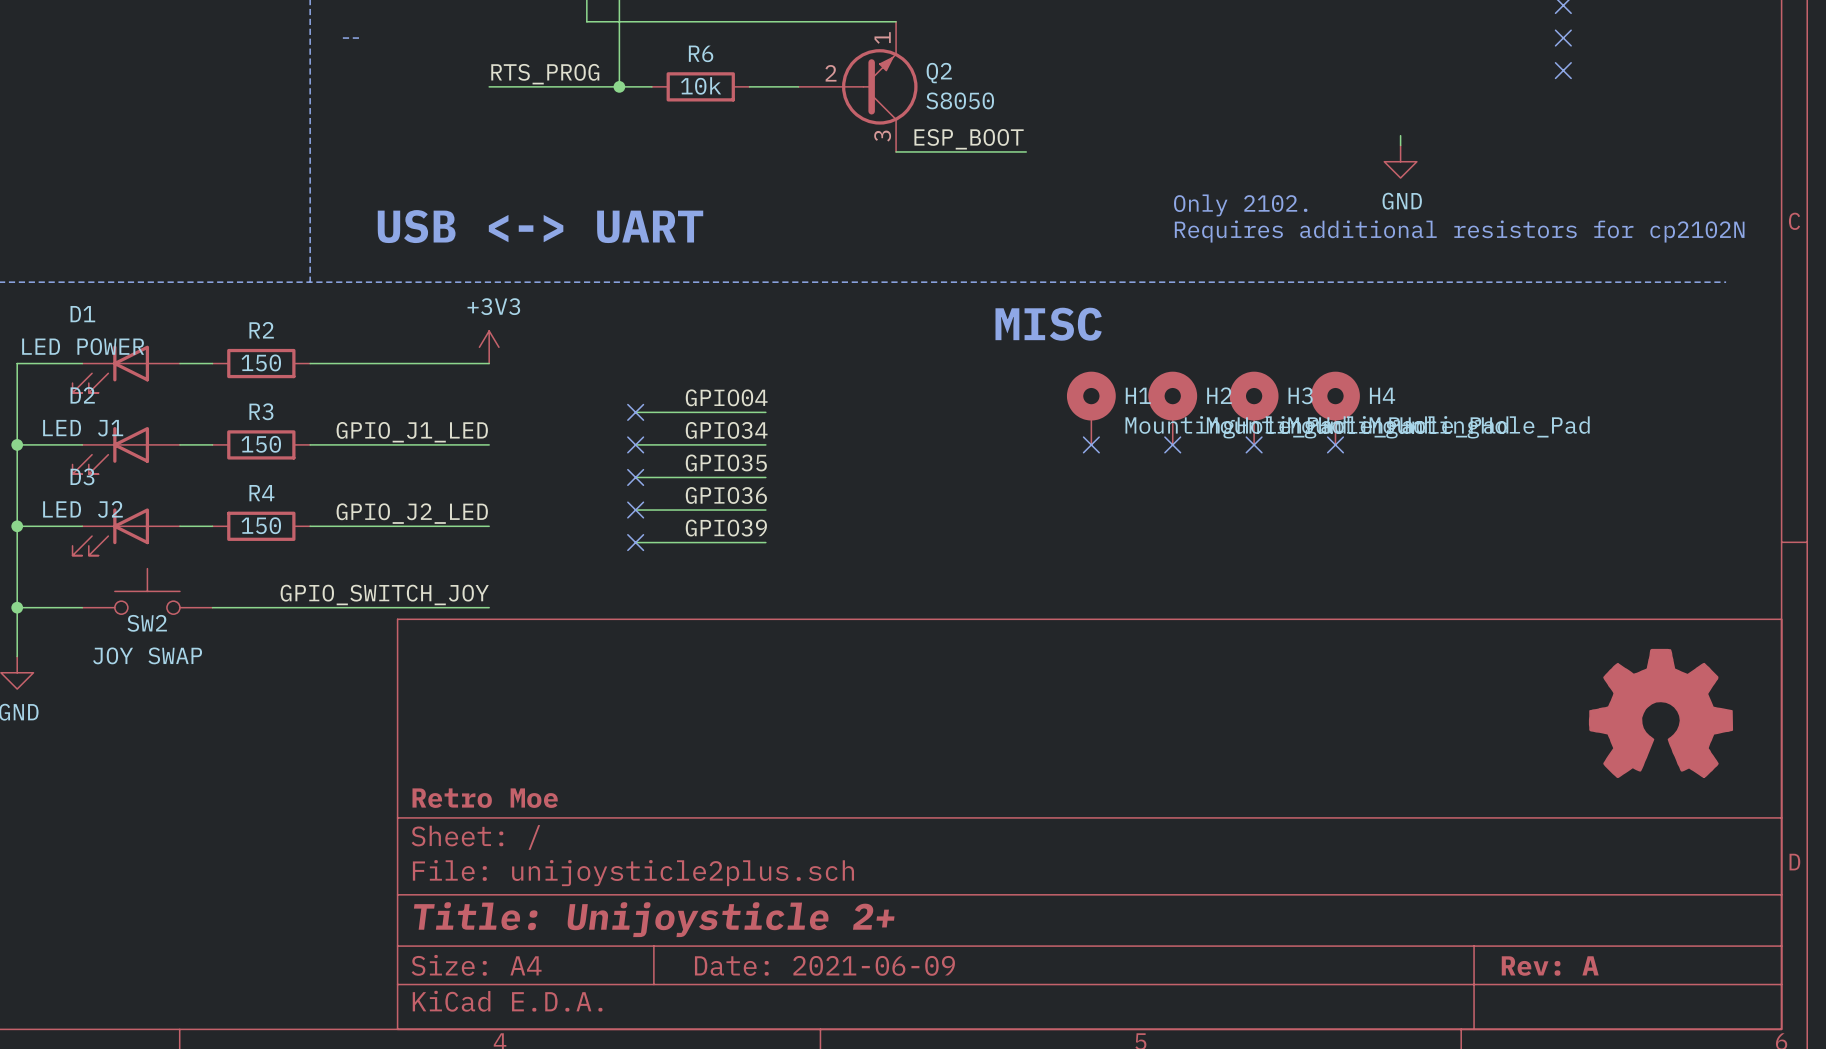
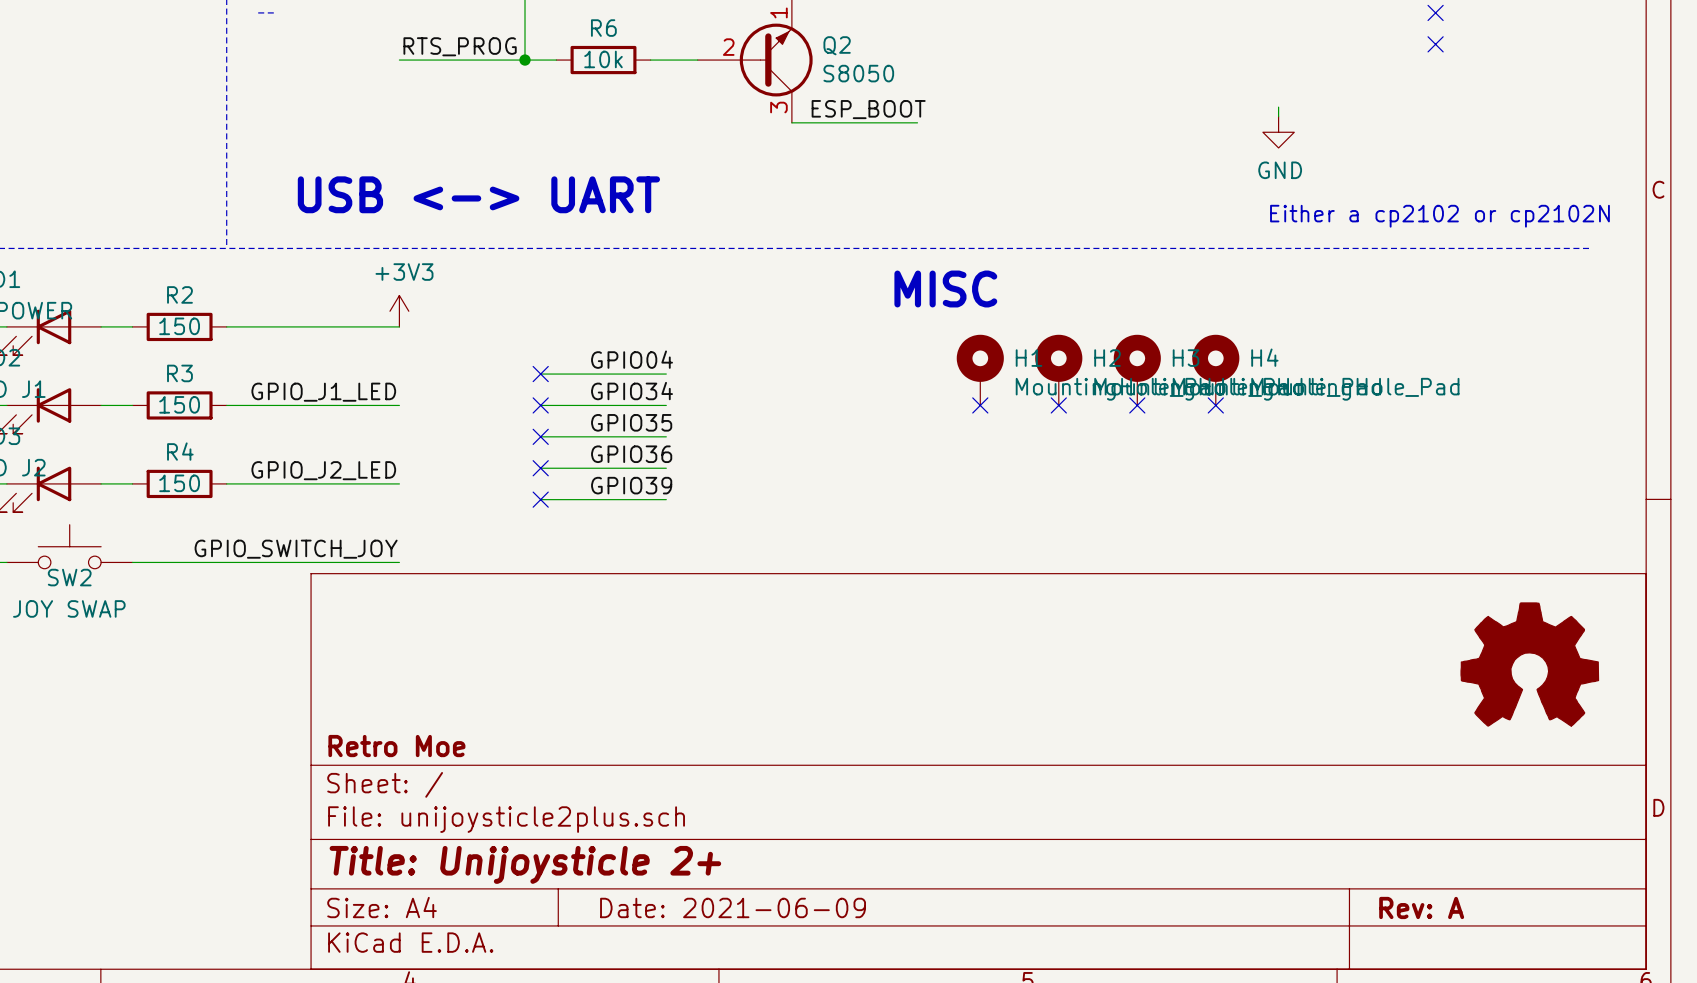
text: Only 2102. (1240, 205) -> none
text: Requires additional resistors for cp2102N (1459, 231) -> none
text: none -> Either a cp2102 or cp2102N (1439, 216)

